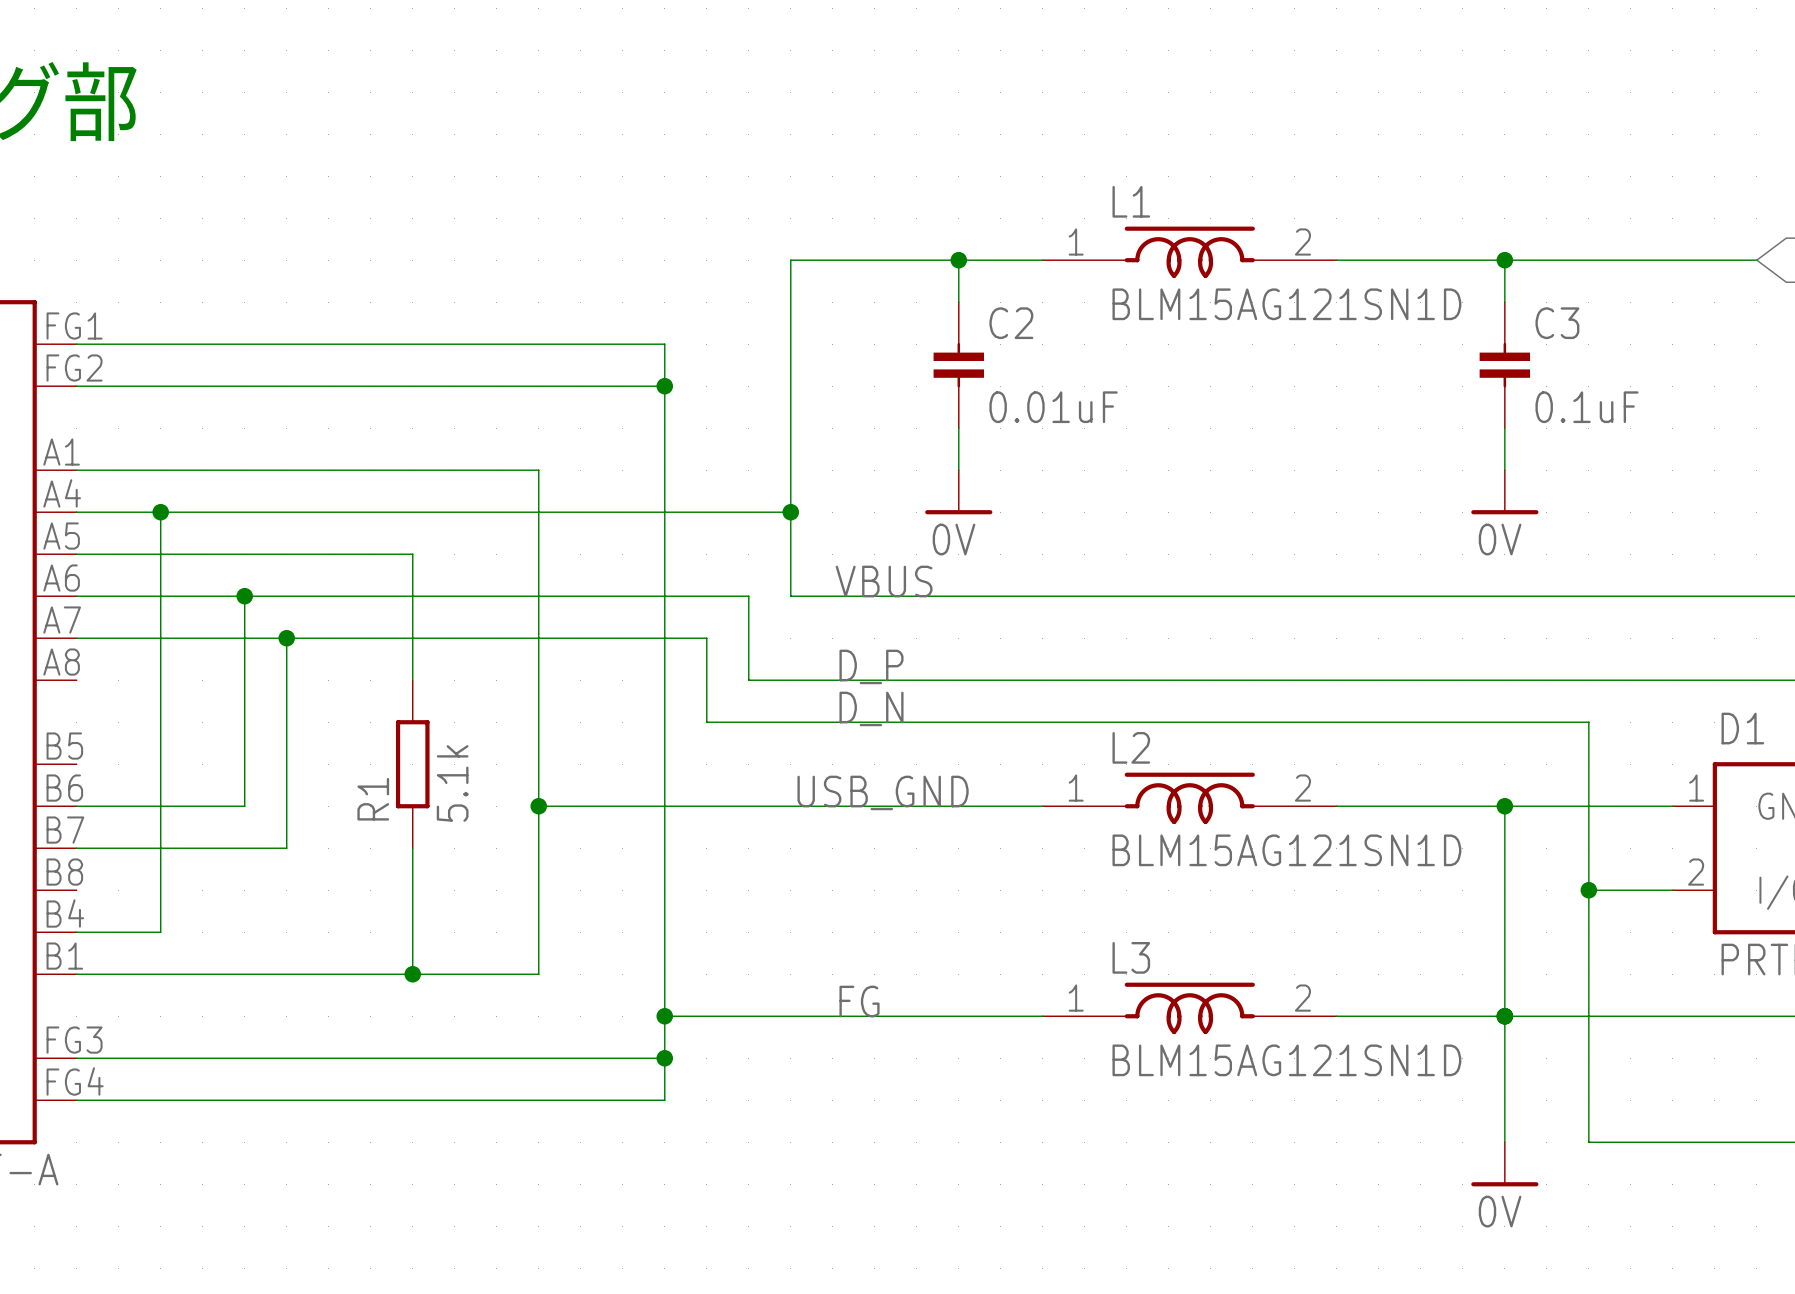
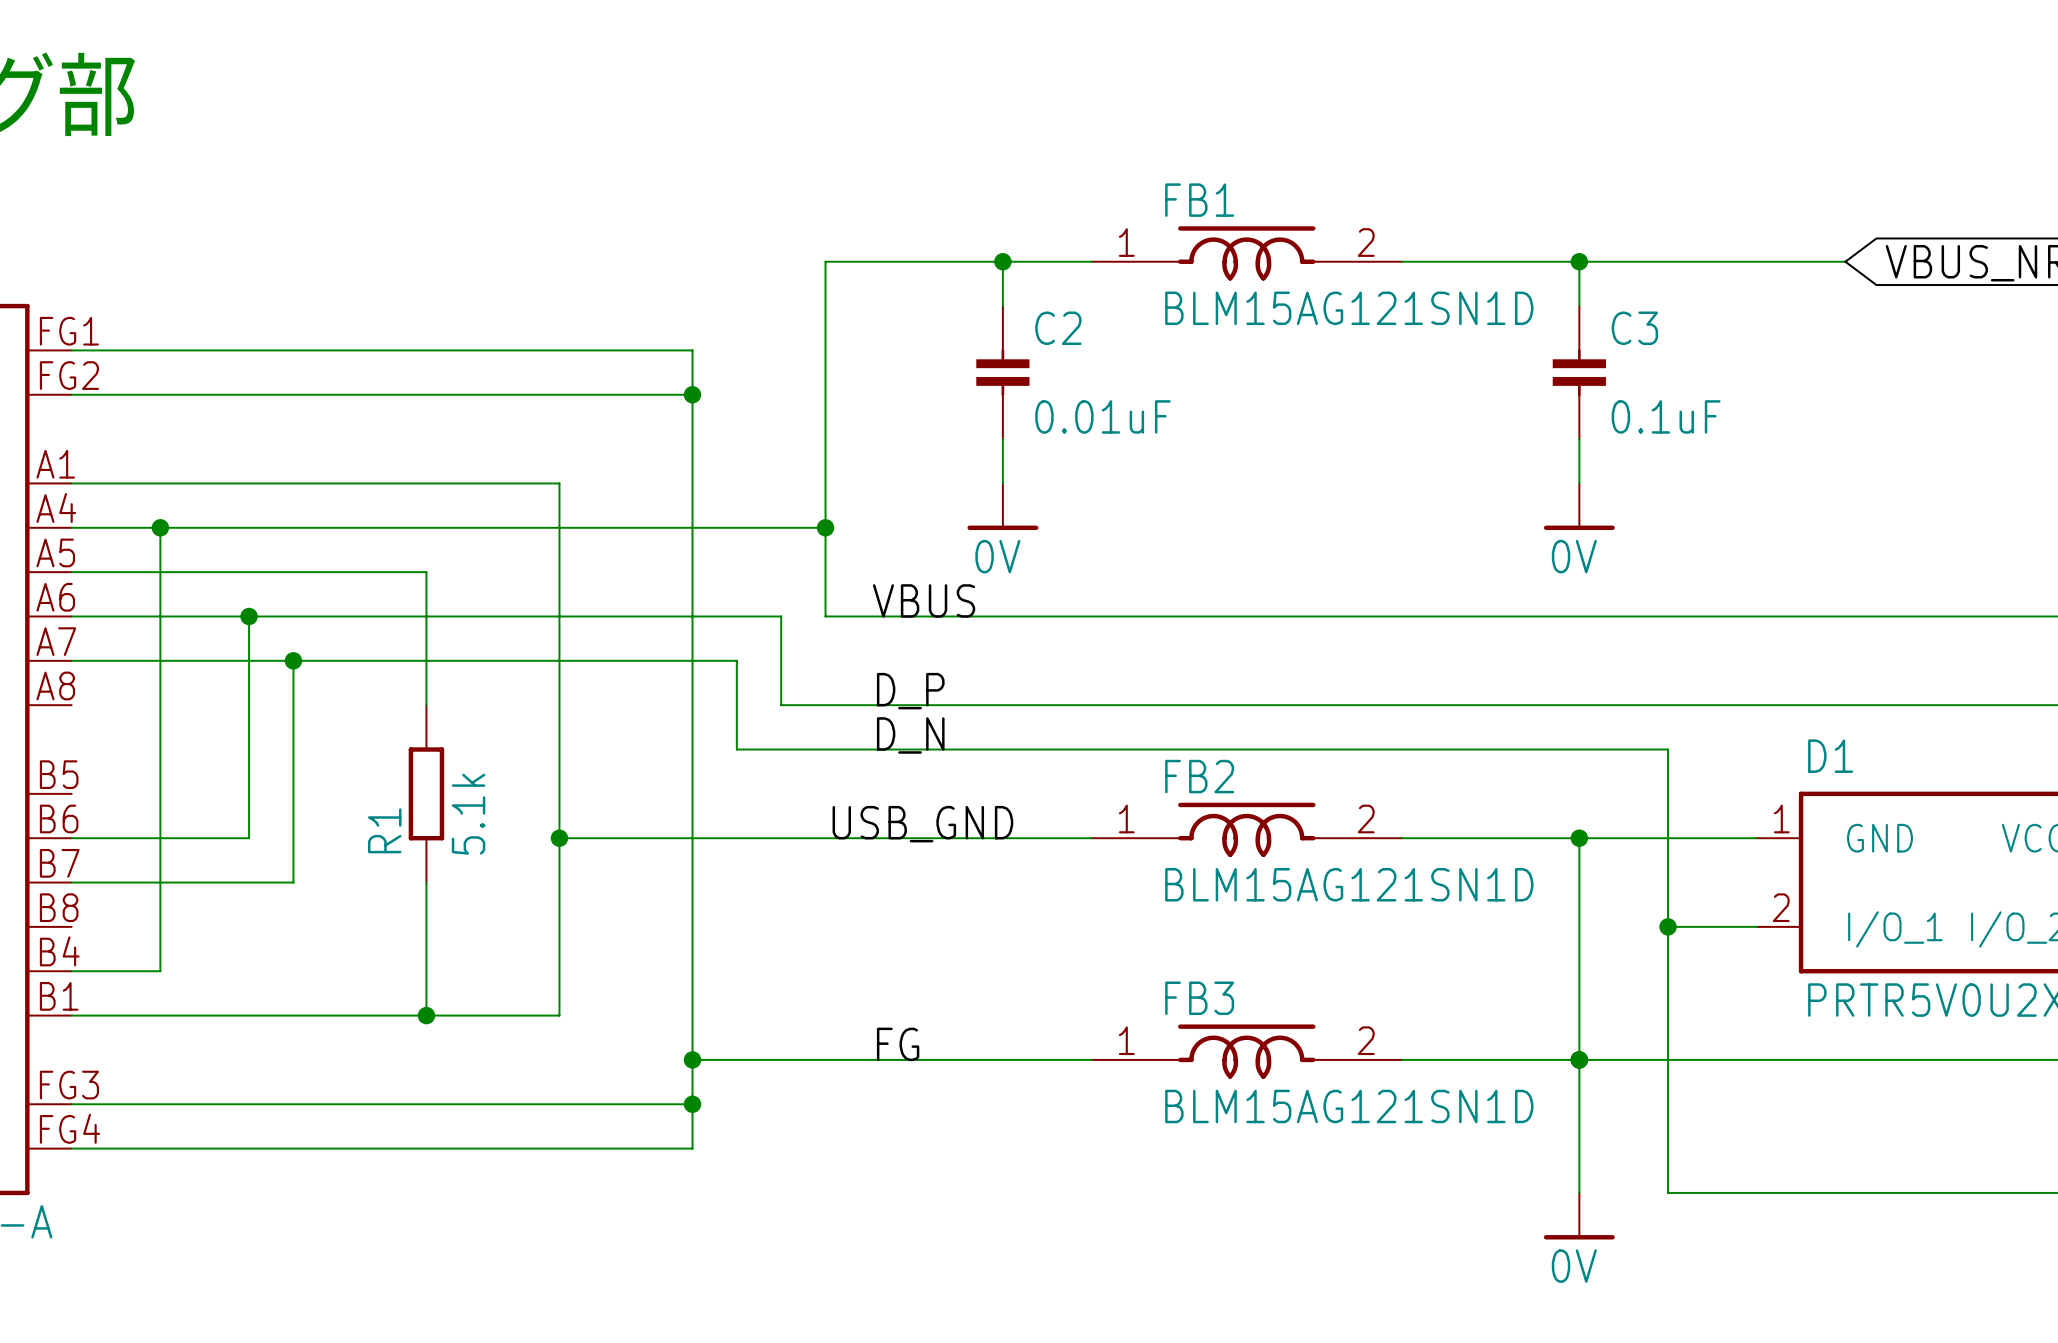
L1 name: L1 (1131, 201) -> FB1 (1199, 200)
L2 name: L2 (1131, 747) -> FB2 (1199, 776)
L3 name: L3 (1131, 957) -> FB3 (1199, 998)

